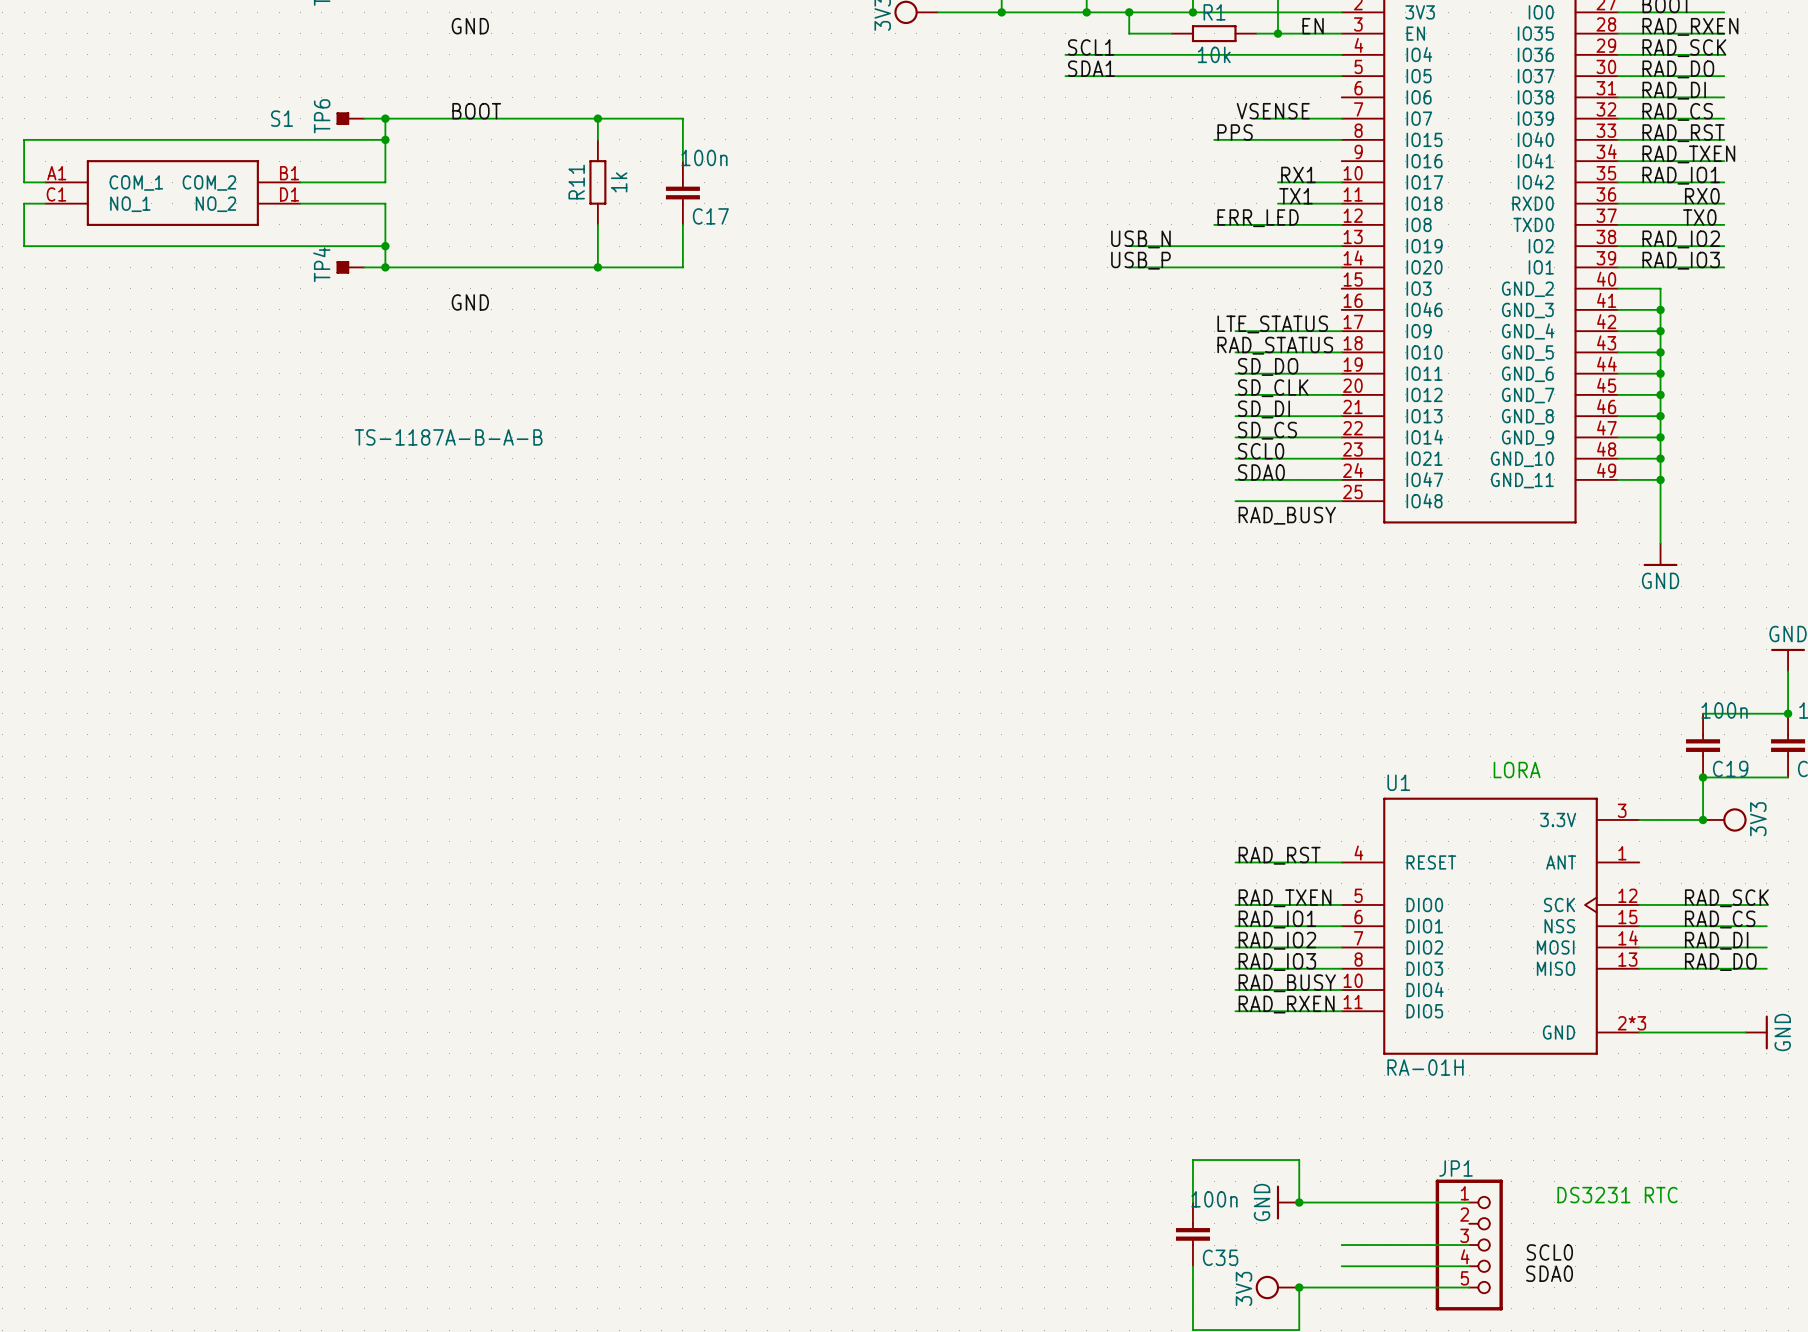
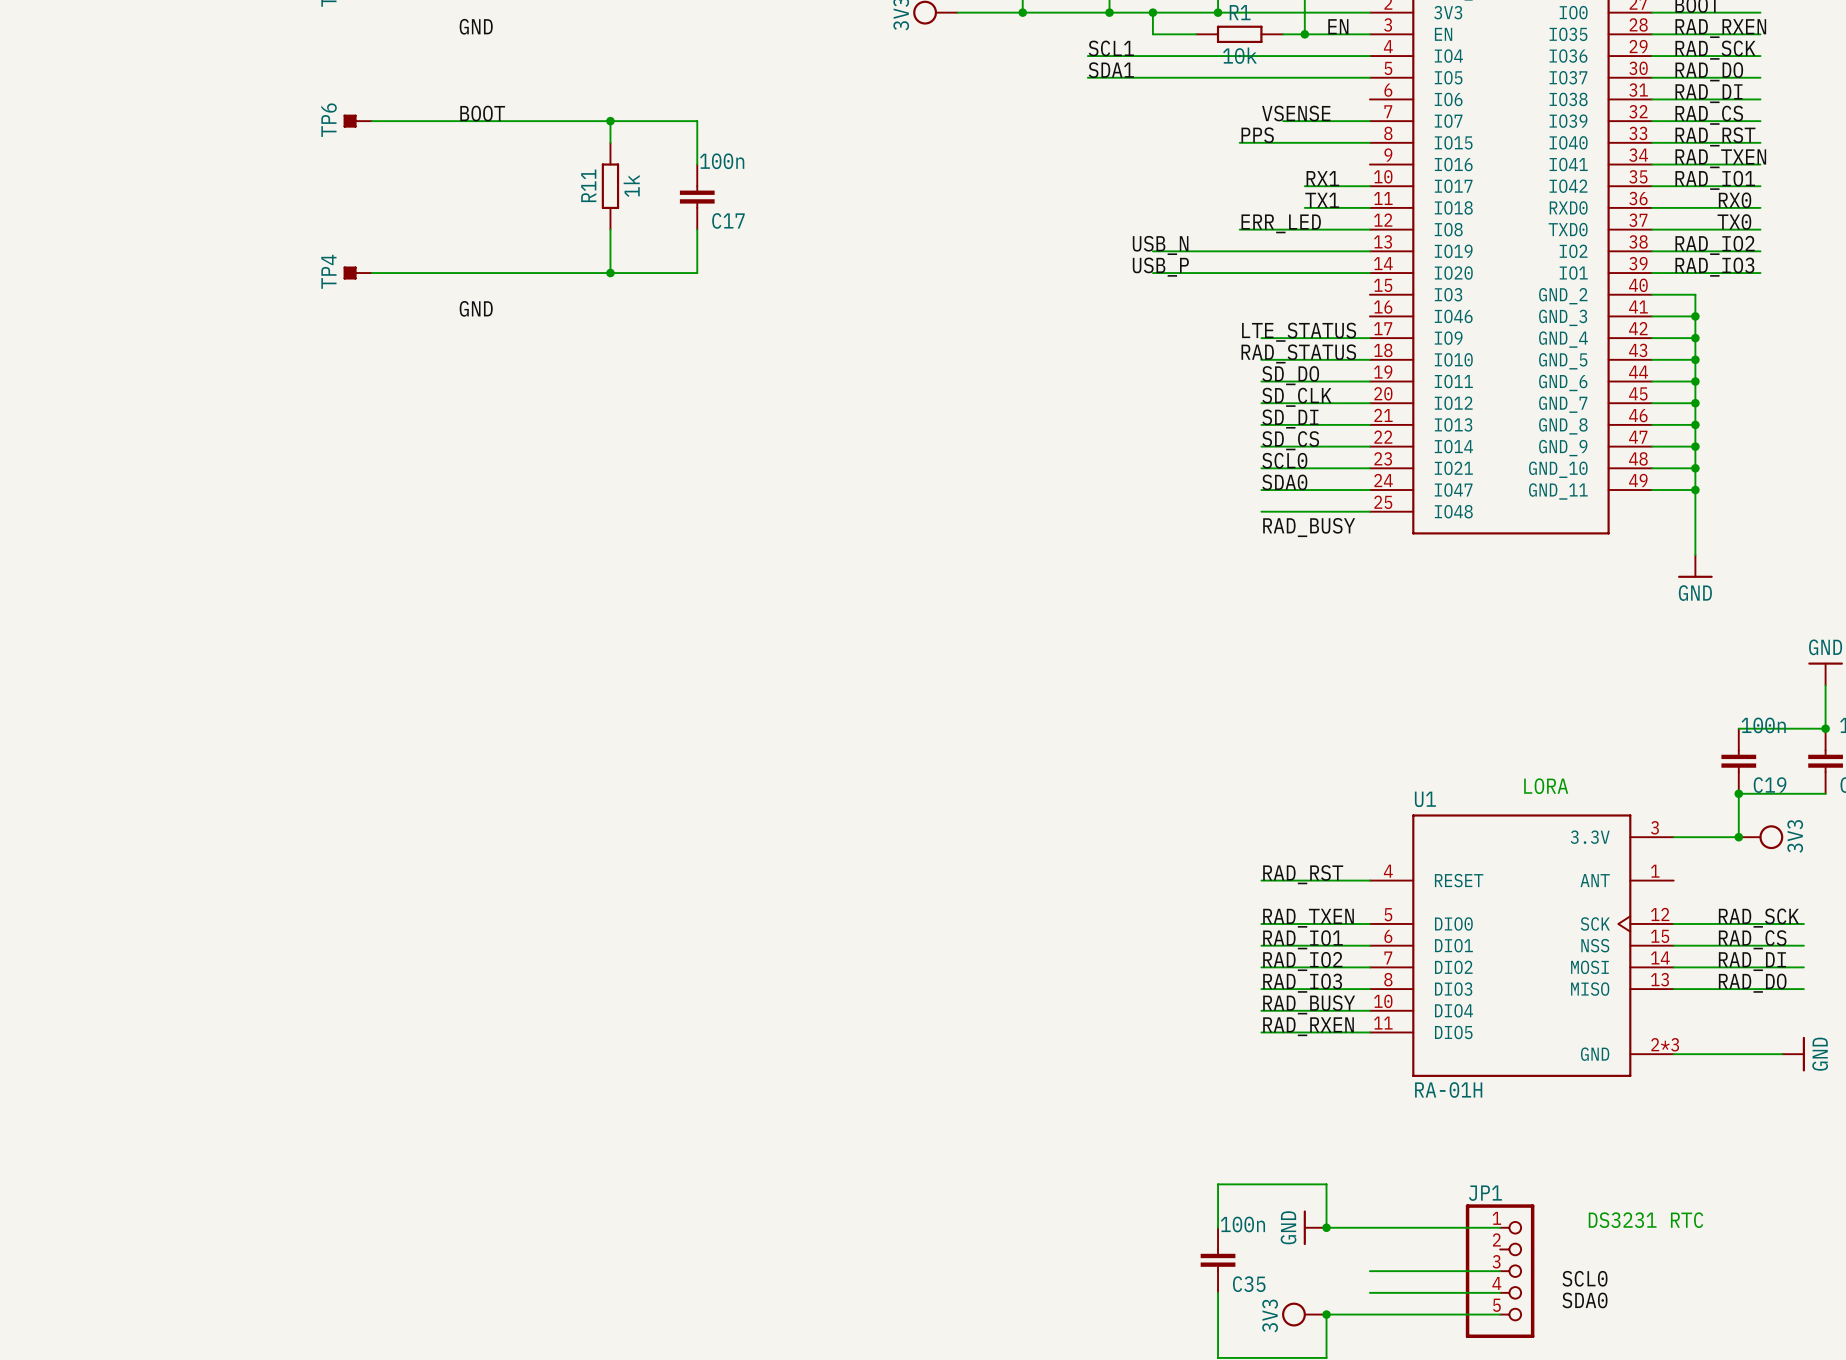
wire: (385, 118) (385, 182) (300, 182) -> none
junction: (385, 118) -> none
wire: (385, 139) (24, 139) (24, 182) (45, 182) -> none
junction: (385, 139) -> none
S1: TS-1187A-B-A-B (172, 193) -> none
wire: (45, 203) (24, 203) (24, 246) (385, 246) -> none
wire: (300, 203) (385, 203) (385, 267) -> none
junction: (385, 246) -> none
junction: (385, 267) -> none

